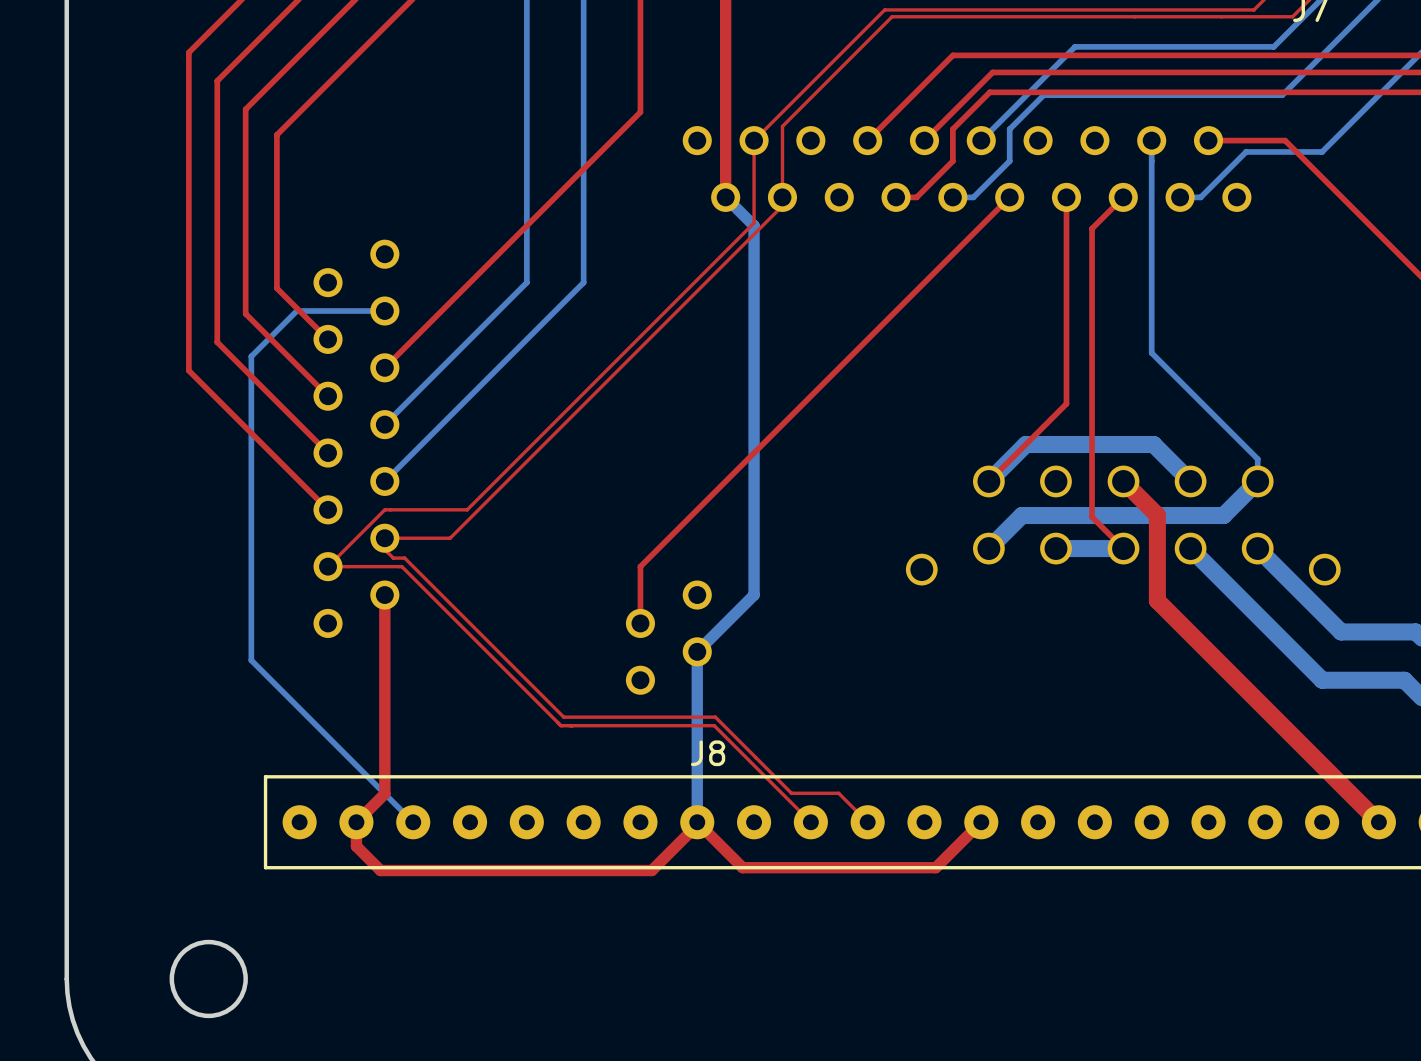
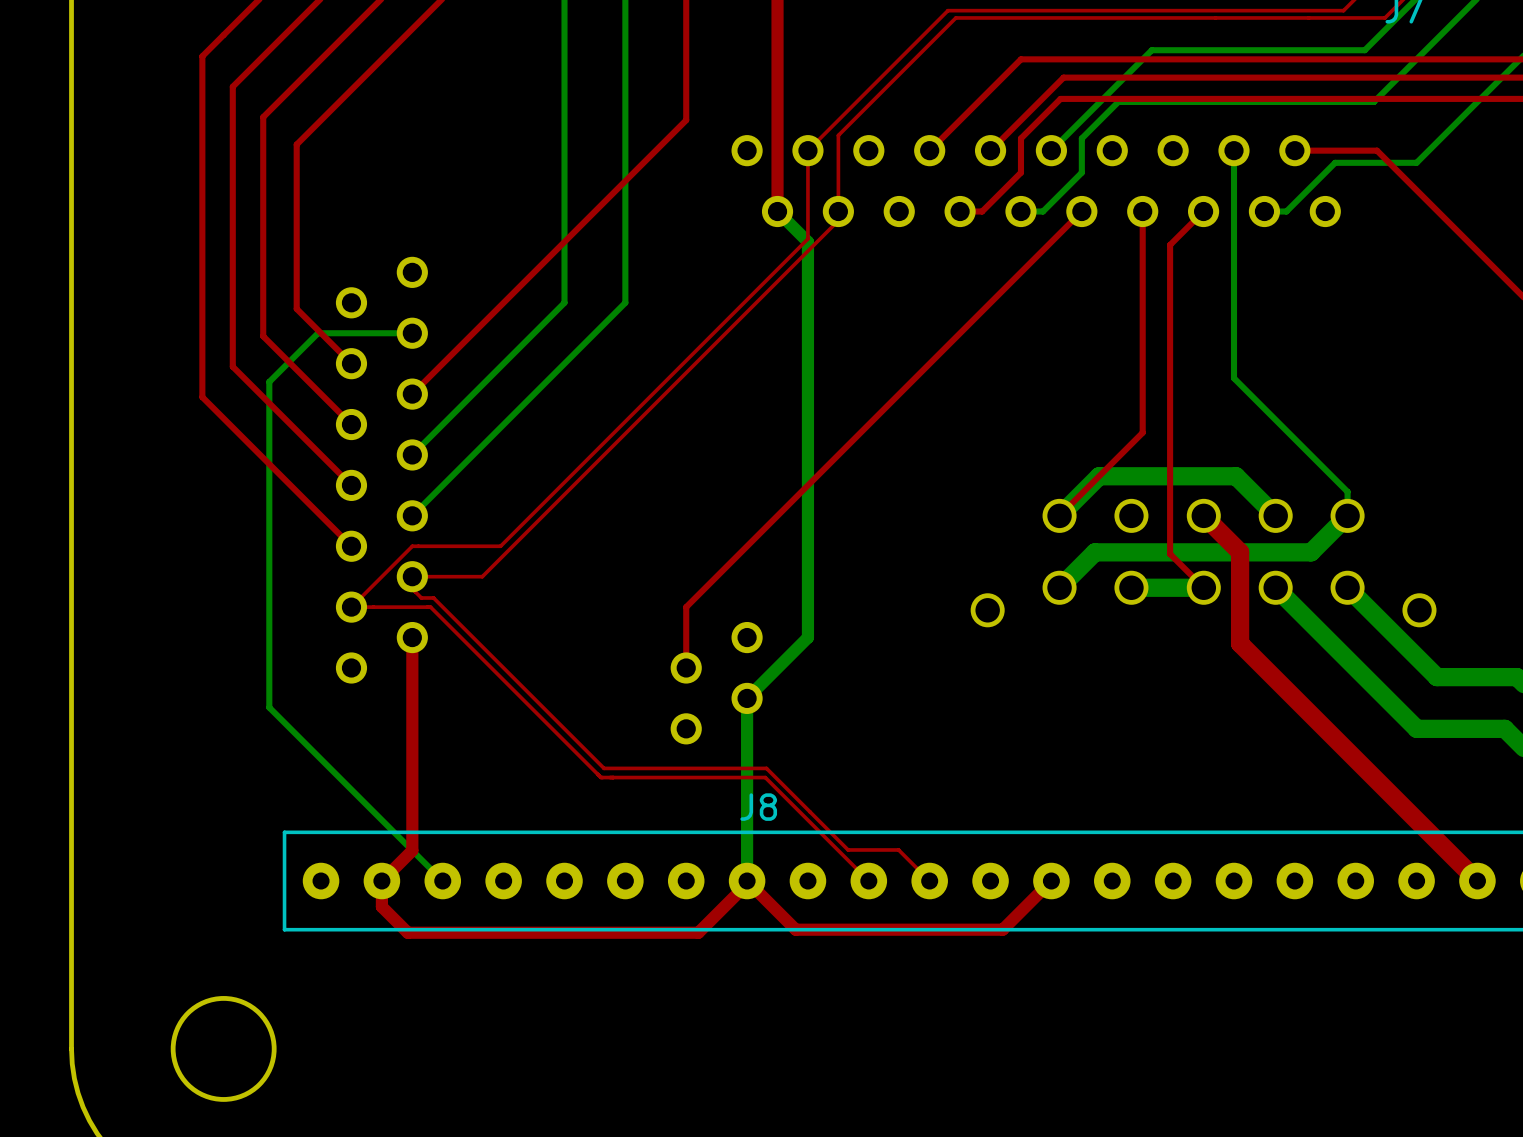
round board edge size: [169, 939, 248, 1019] -> [170, 996, 277, 1102]

